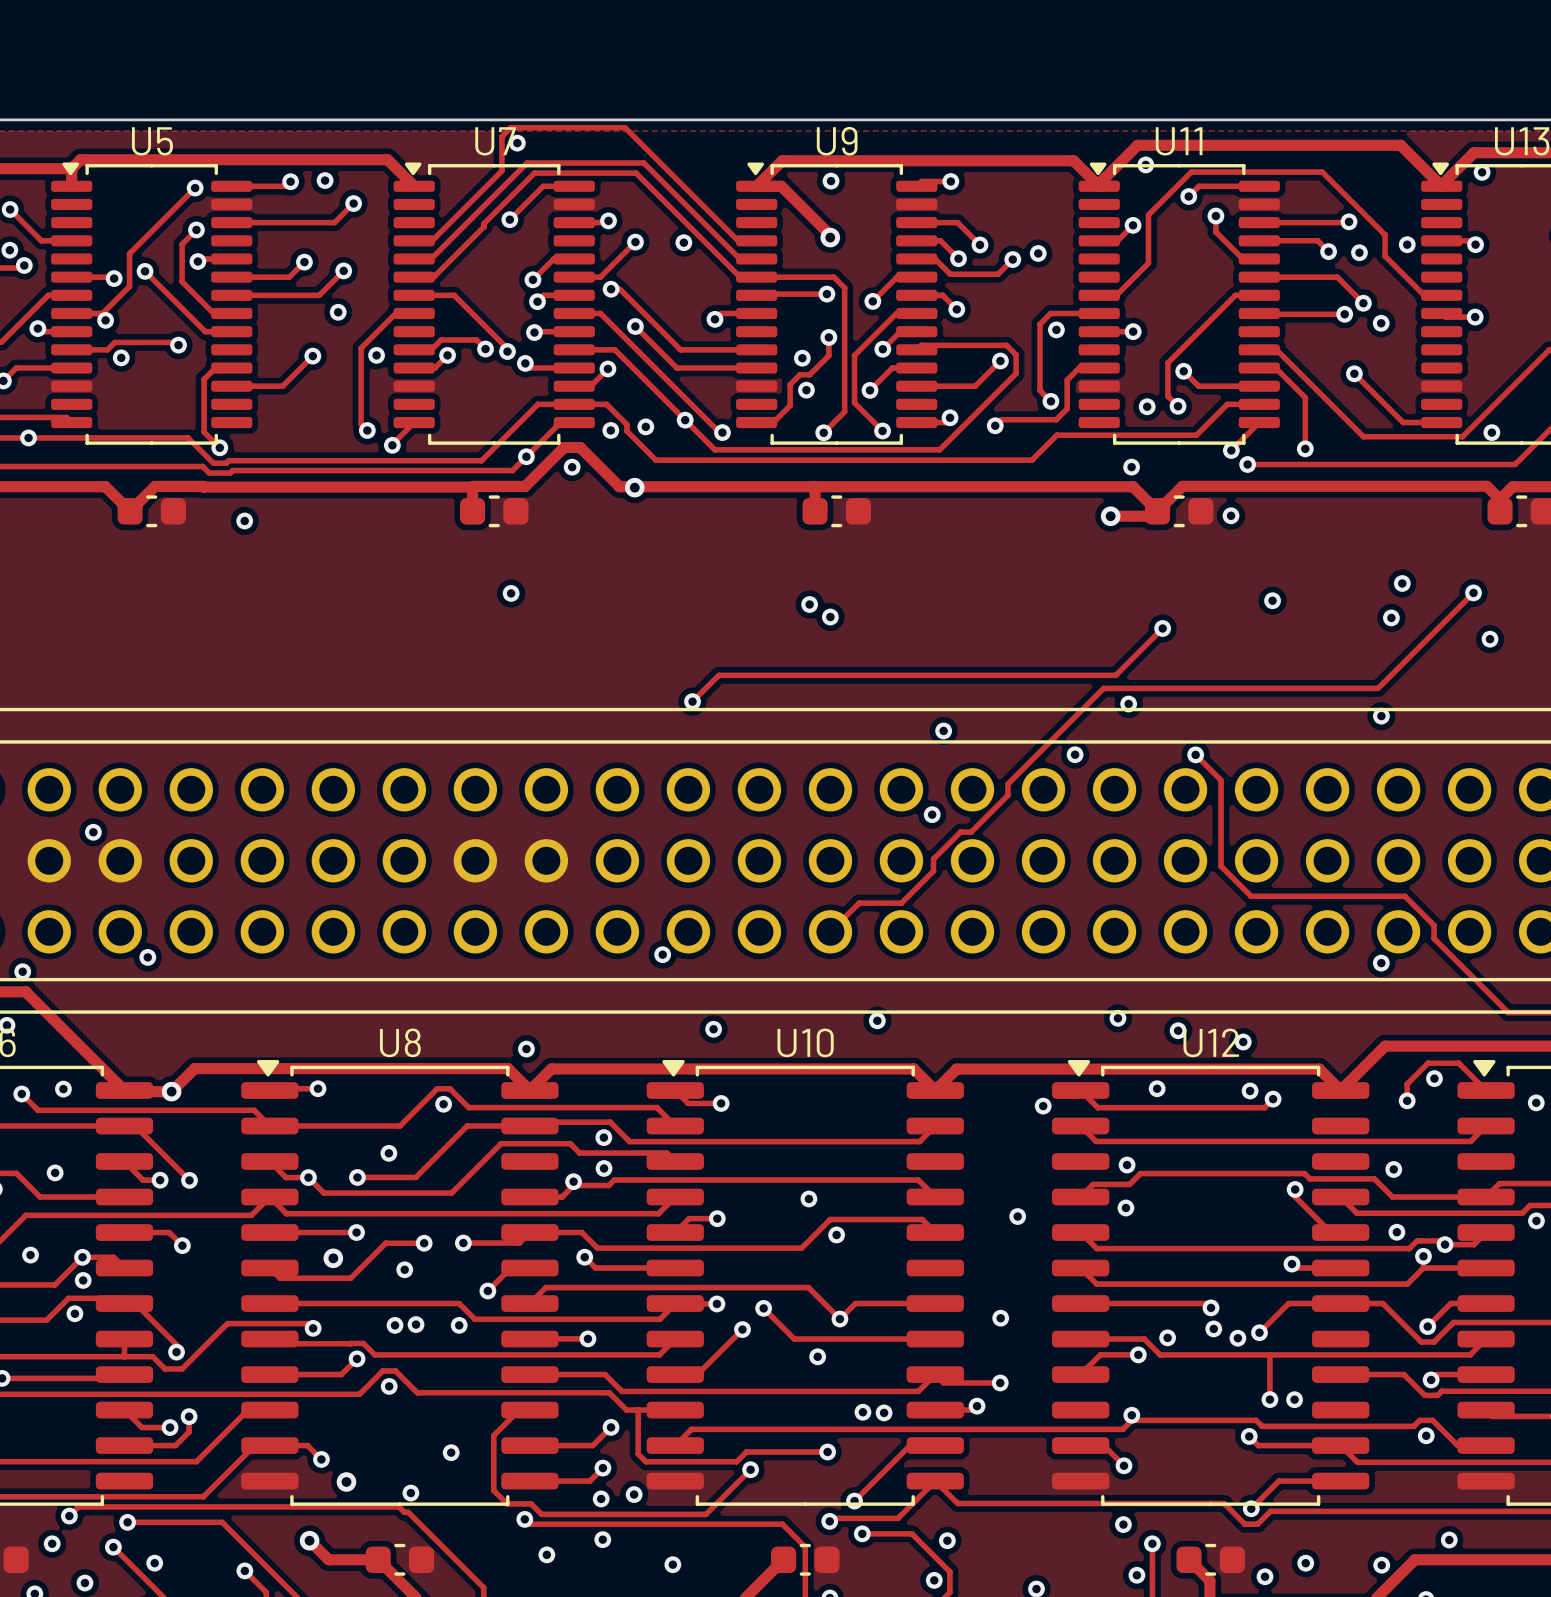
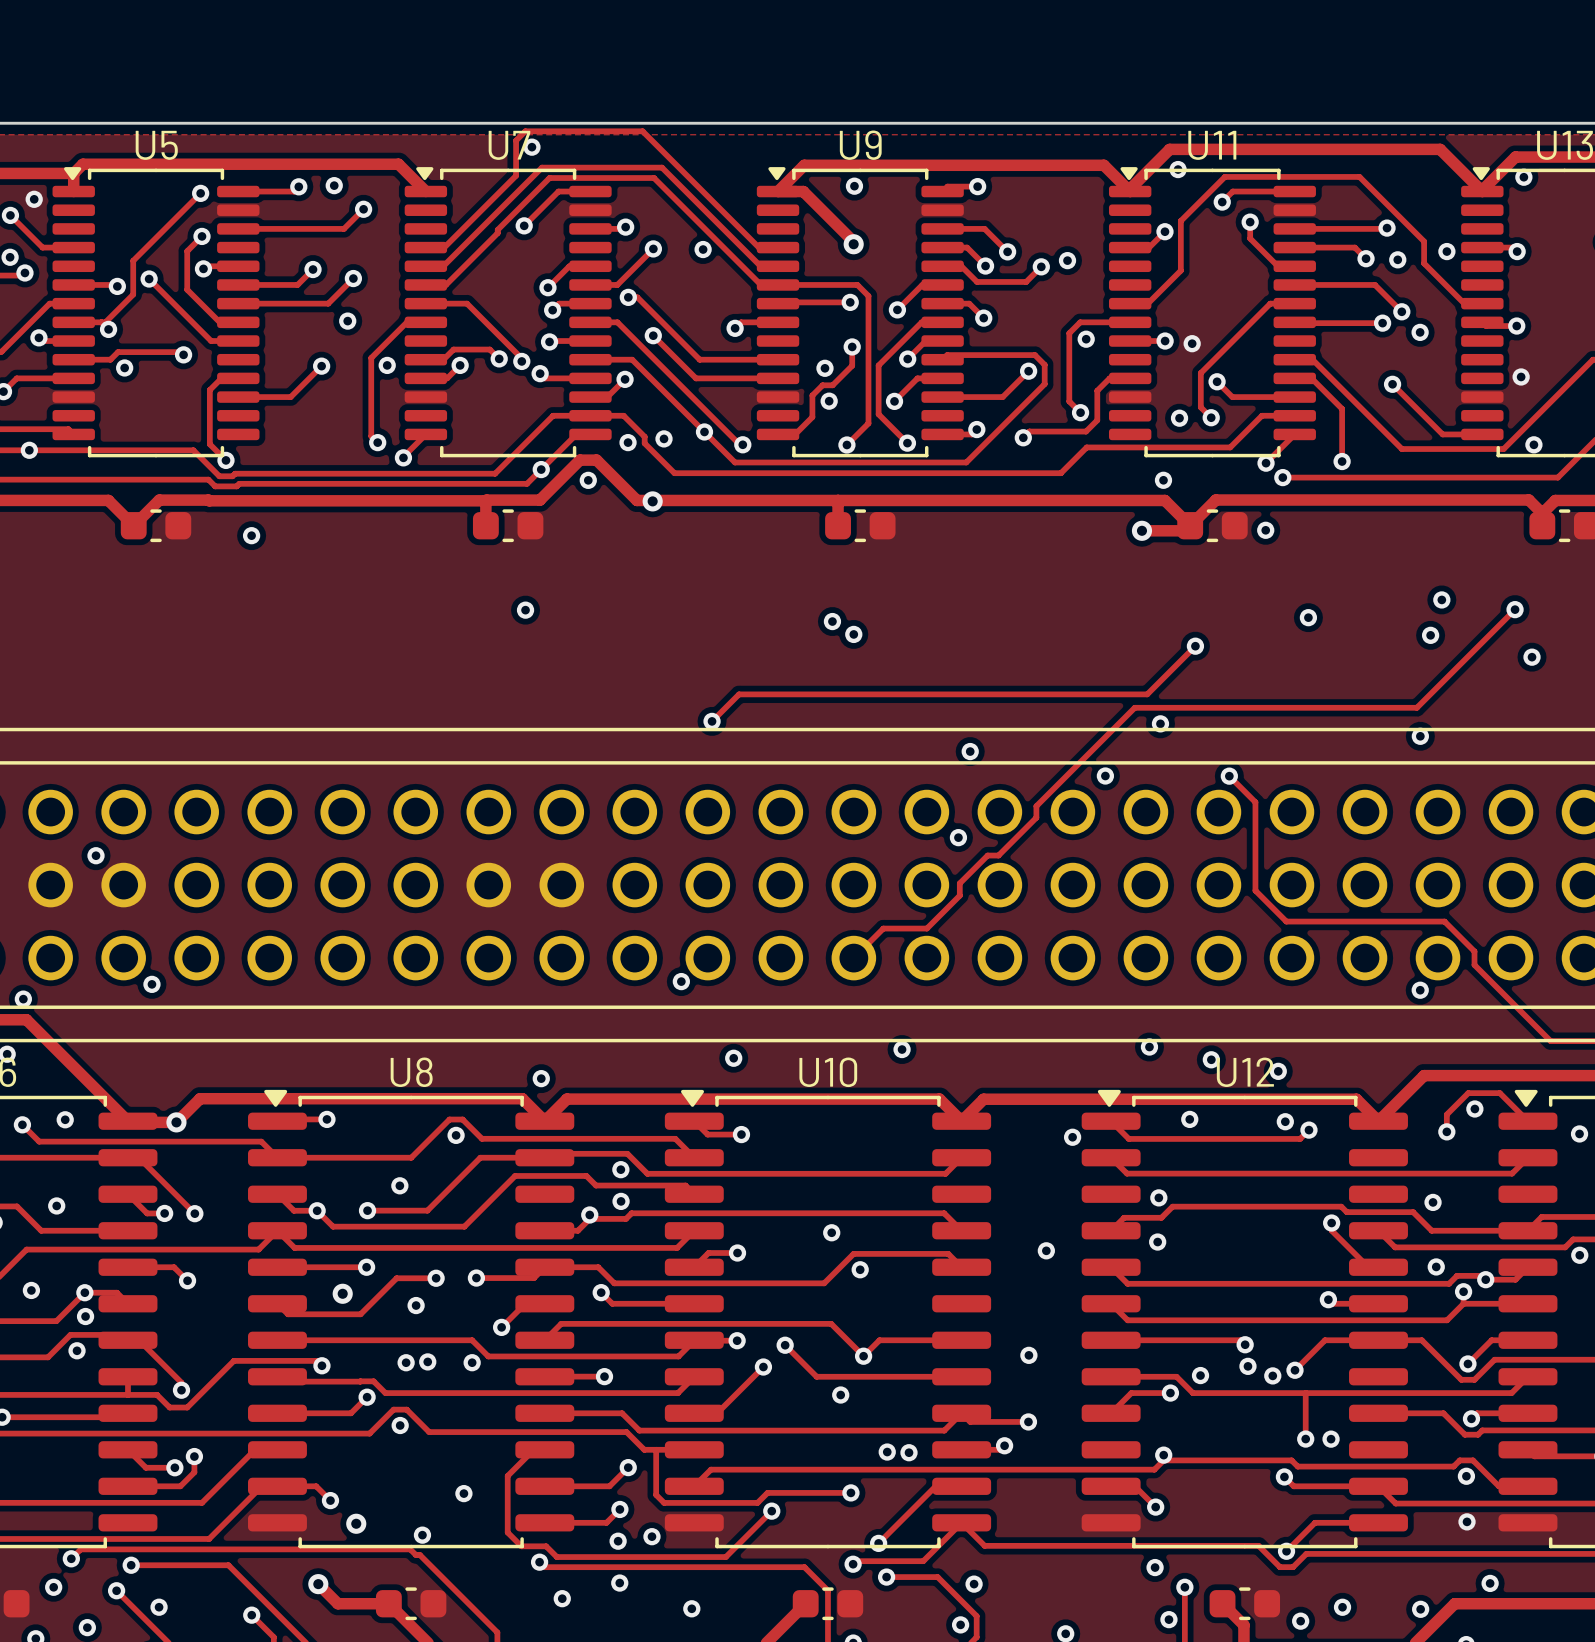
via: none -> (34, 199)
via: none -> (1192, 343)
via: none -> (1521, 376)
via: none -> (1467, 1521)

